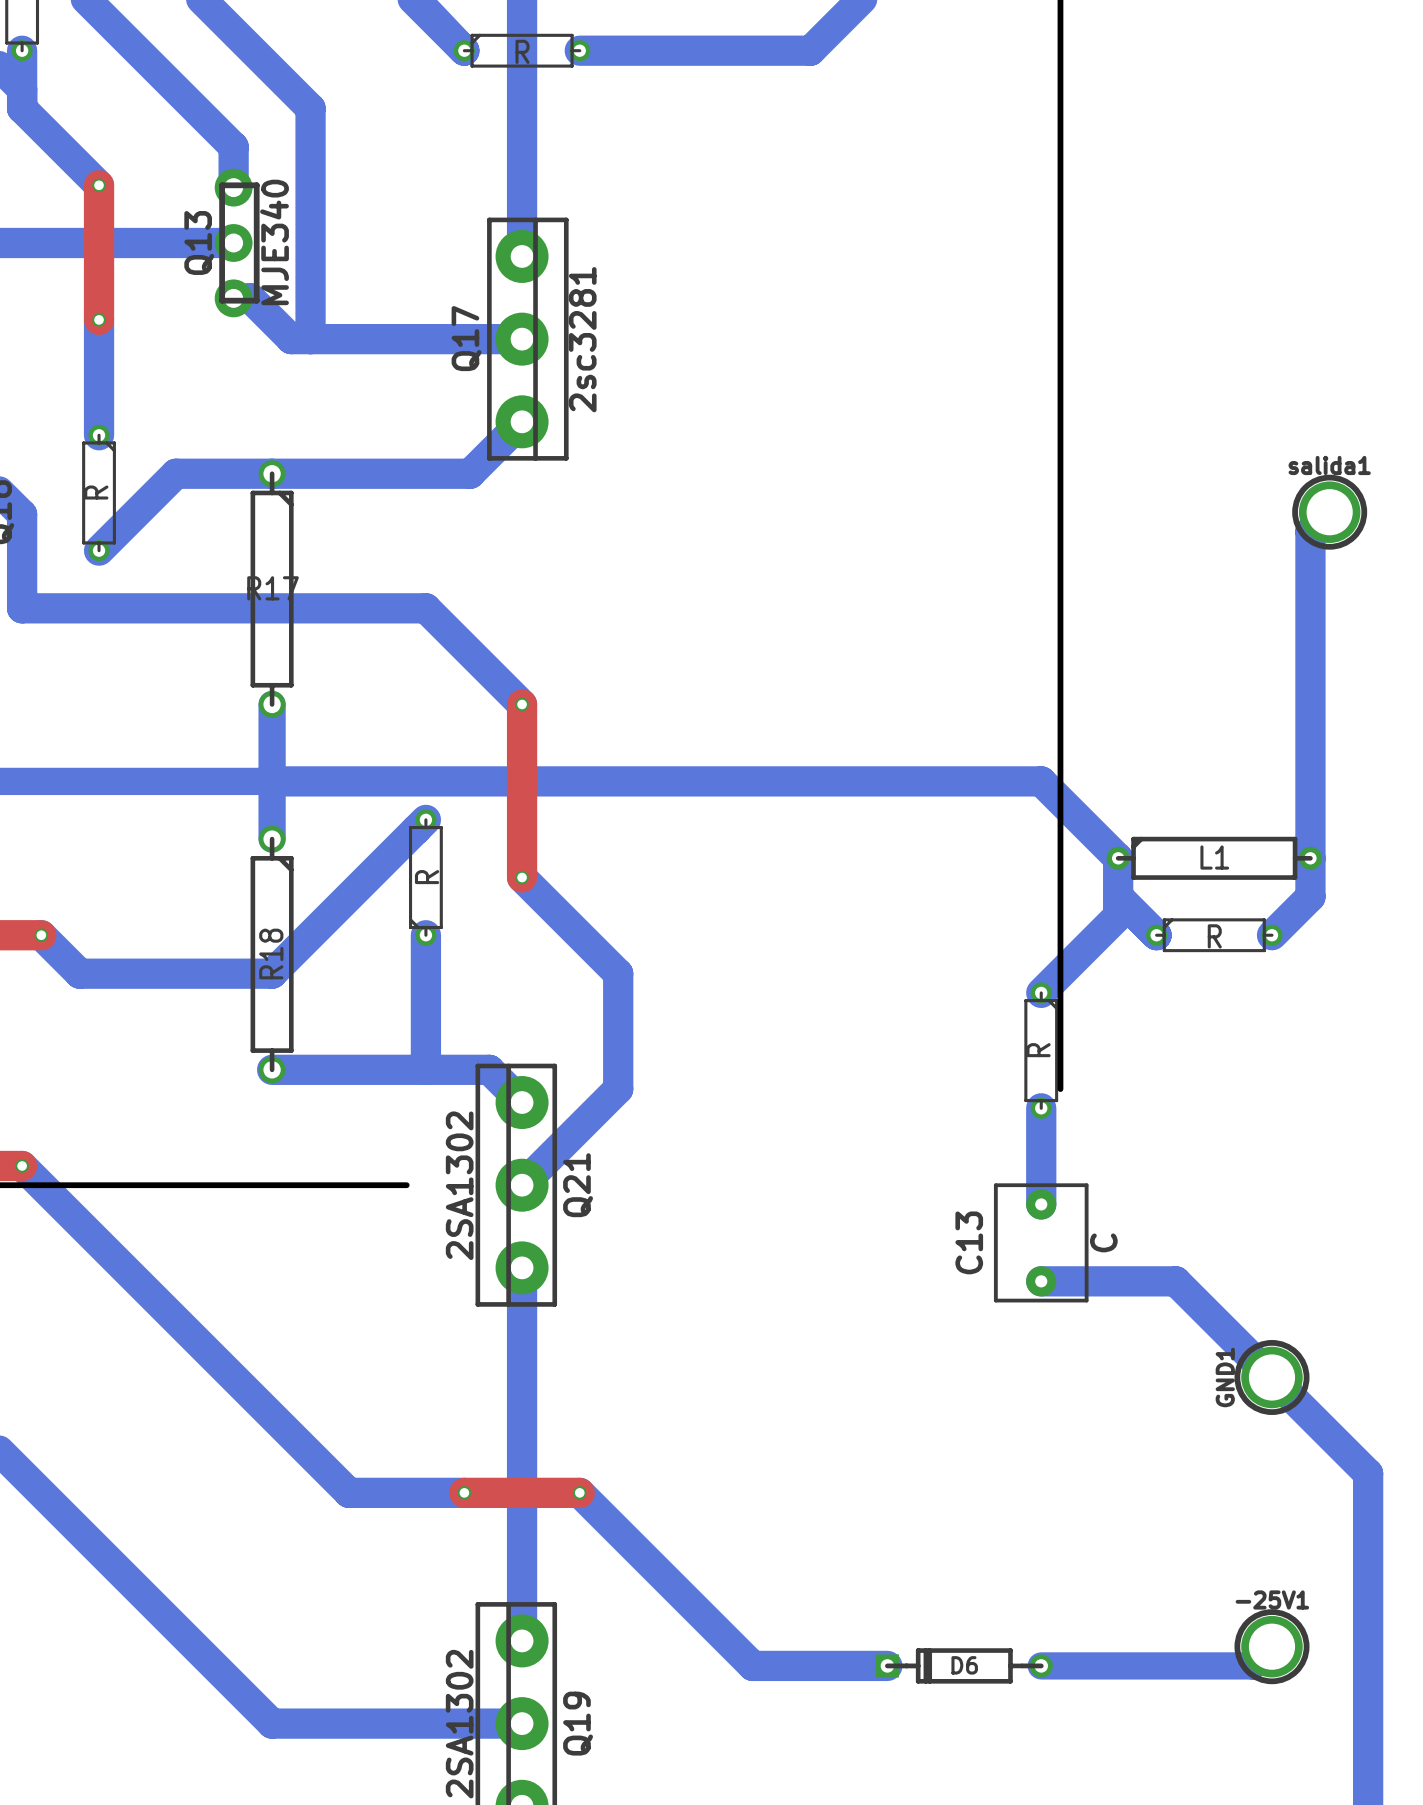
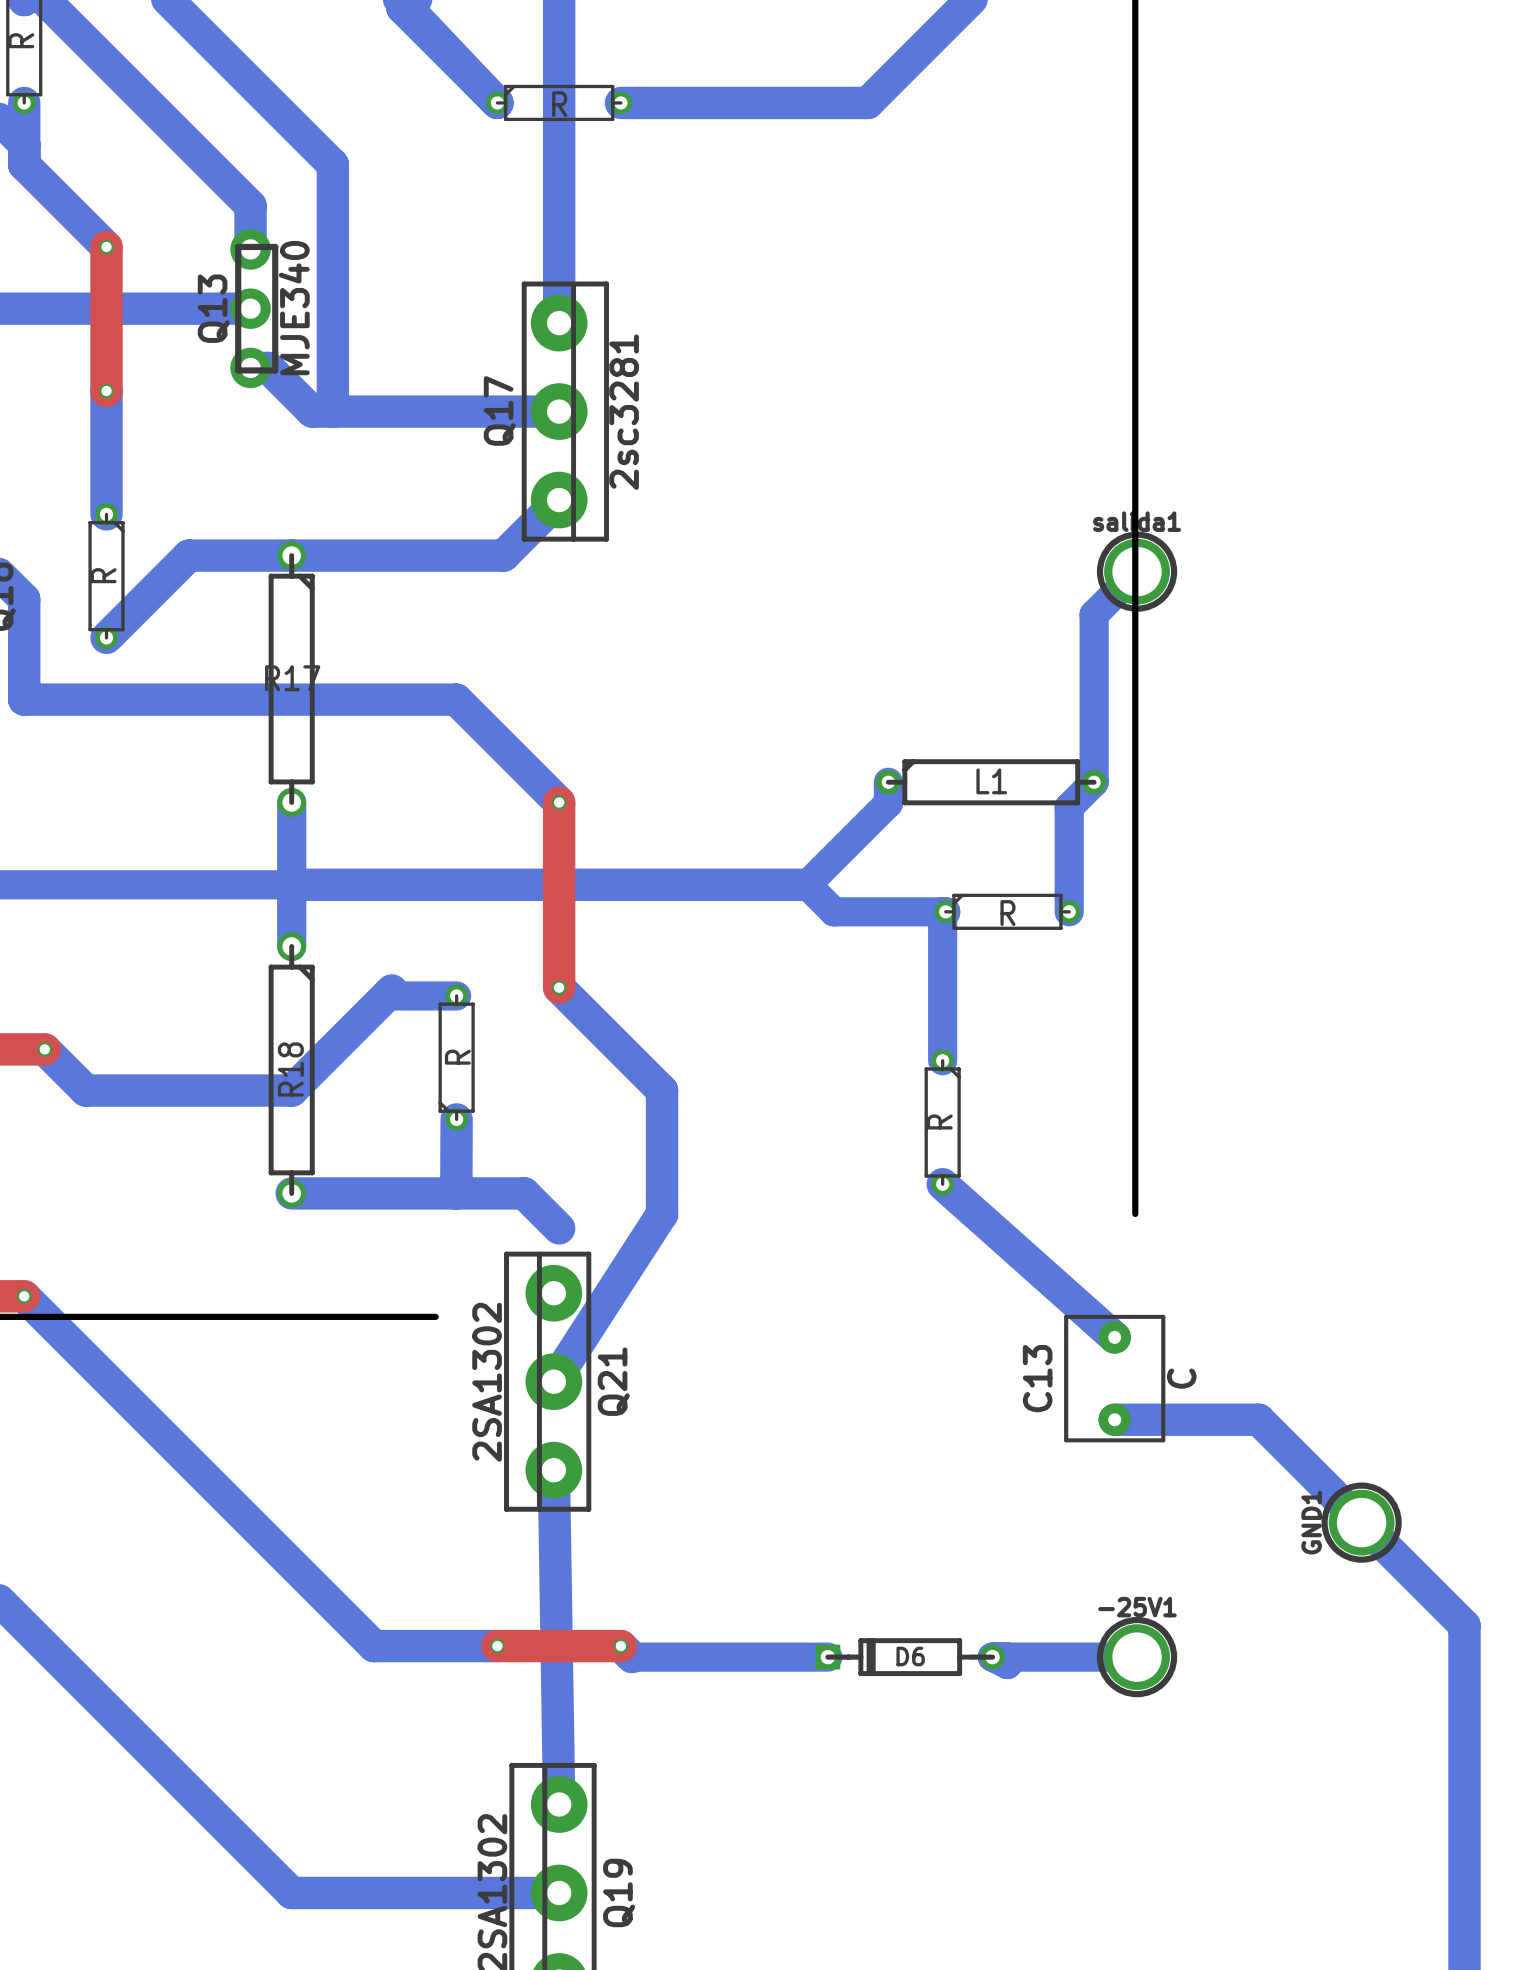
bottom track: none -> (1137, 571) (1094, 614) (1094, 782) (1069, 807) (1069, 911)
bottom track: (1329, 512) (1310, 531) (1310, 896) (1271, 935) -> none
salida1 position: (1329, 512) -> (1137, 571)
bottom track: none -> (888, 782) (888, 803) (806, 884) (833, 911) (945, 911)
bottom track: (753, 781) (1041, 781) (1118, 858) (1118, 916) (1041, 992) -> none
bottom track: none -> (942, 911) (942, 1060)
part: none -> R (1007, 911)
bottom track: (425, 819) (365, 880) -> (456, 995) (386, 995) (391, 992) (391, 990)
L1 position: (1214, 858) -> (991, 782)
part position: (425, 877) -> (456, 1057)
bottom track: (425, 935) (425, 1069) -> (456, 1119) (456, 1193)
part: R (1214, 935) -> none
part: none -> R (942, 1122)
part: R (1041, 1050) -> none
bottom track: (618, 1089) (522, 1185) -> (662, 1214) (553, 1381)
bottom track: (1041, 1108) (1041, 1204) -> (942, 1184) (1114, 1337)
Q21 position: (516, 1185) -> (547, 1381)
bottom track: (522, 1267) (522, 1640) -> (553, 1470) (559, 1804)
bottom track: (590, 1503) (752, 1665) (887, 1665) -> (631, 1657) (827, 1657)
bottom track: none -> (1007, 1657) (1007, 1664) (992, 1657) (1137, 1657)
bottom track: (1271, 1646) (1252, 1665) (1041, 1665) -> none
-25V1 position: (1271, 1646) -> (1137, 1657)
D6 position: (964, 1665) -> (910, 1657)

